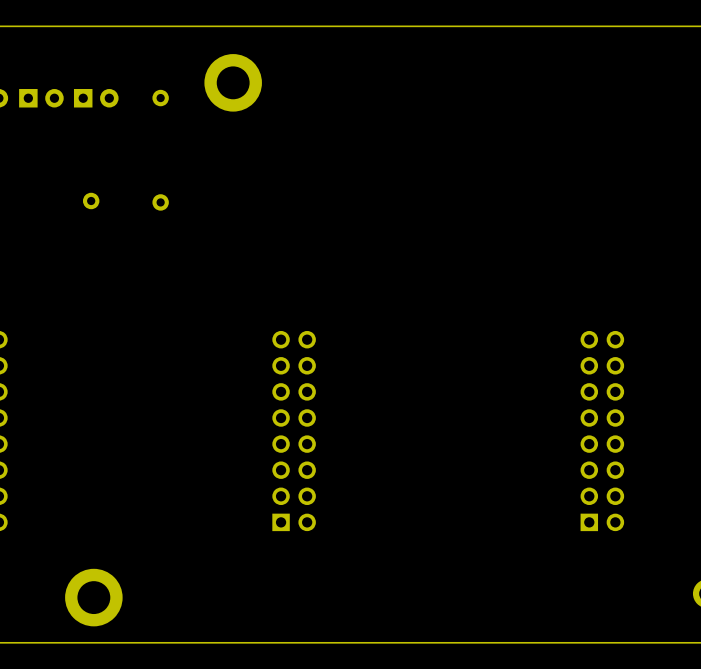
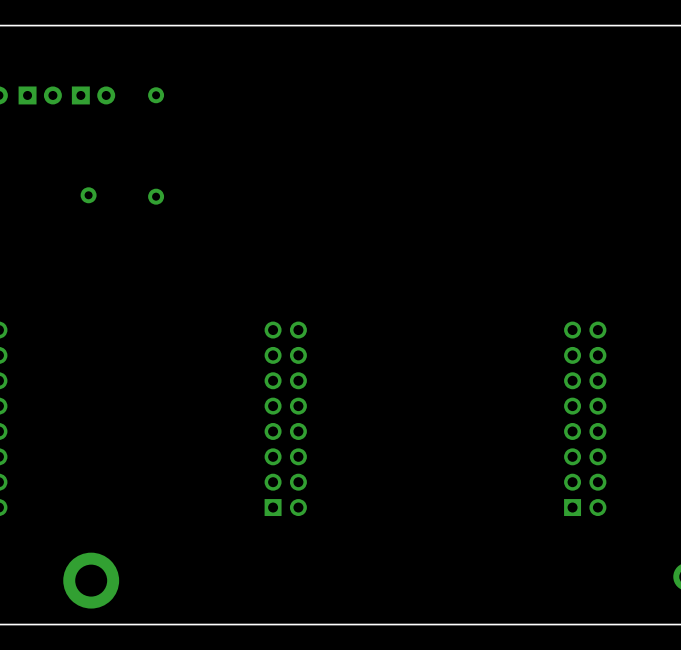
part: (233, 82) -> none

